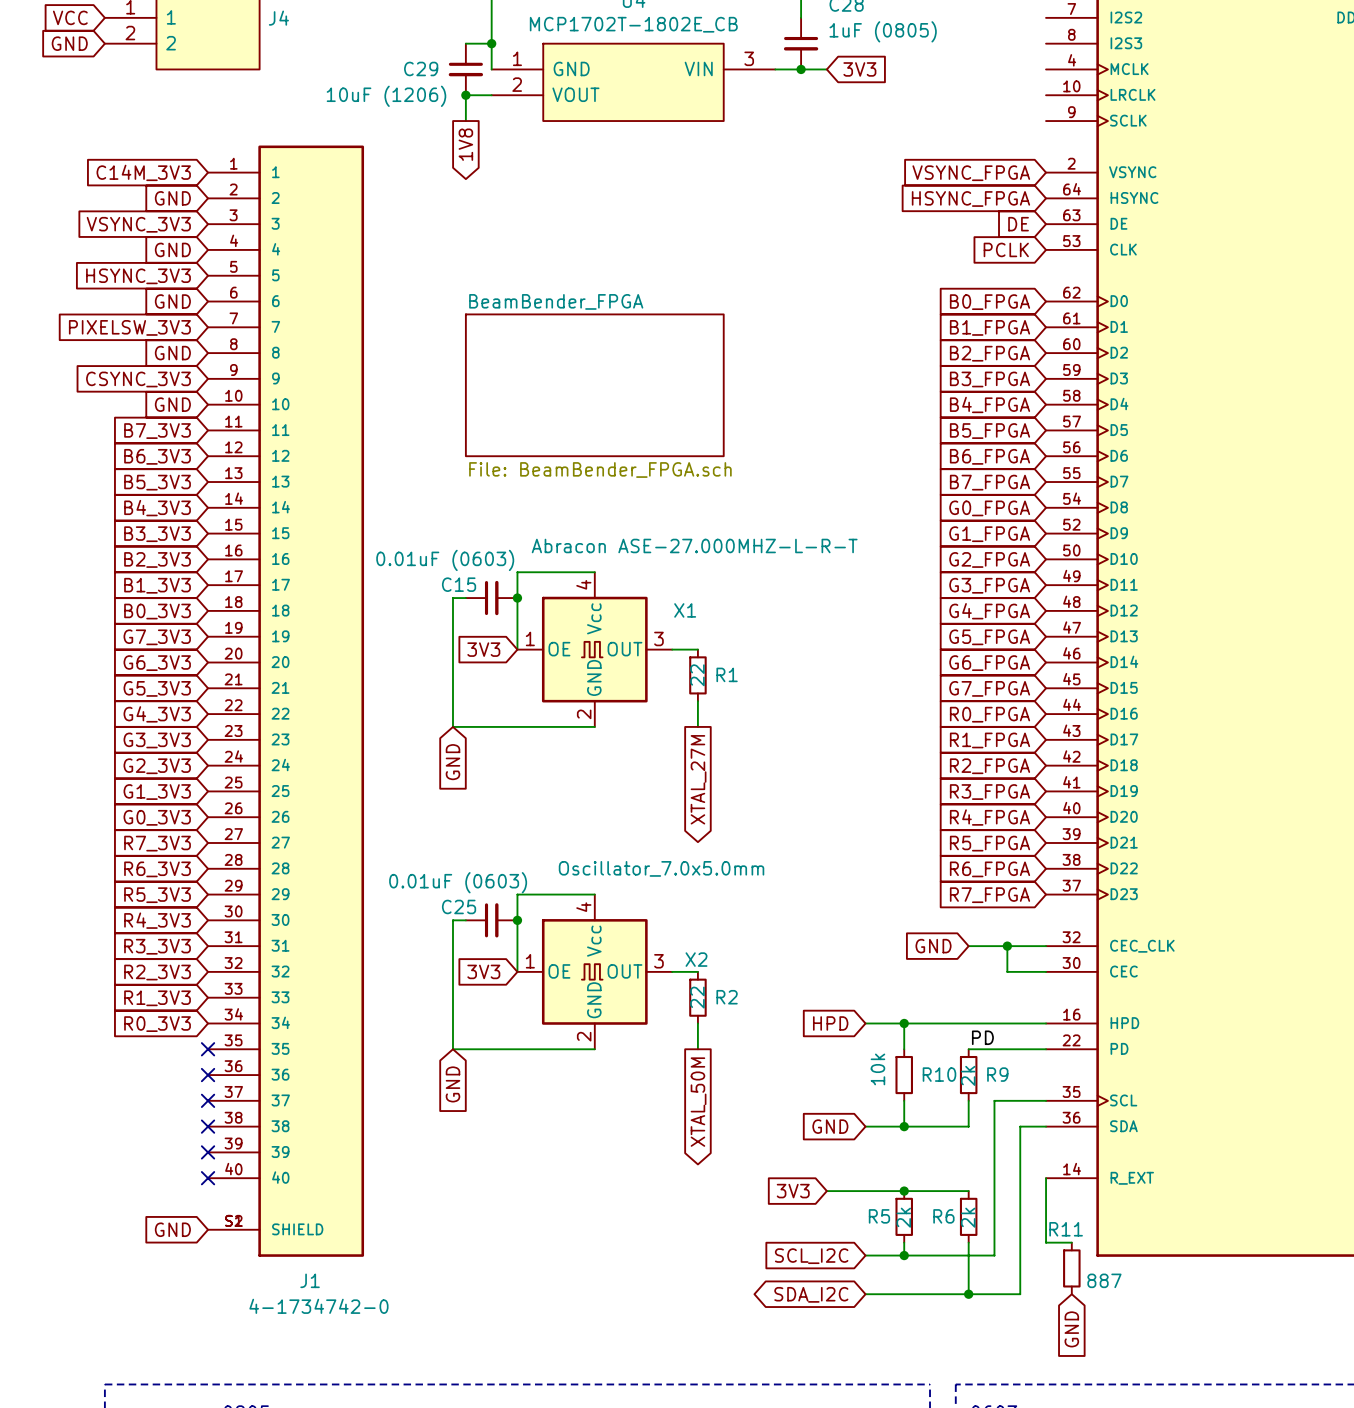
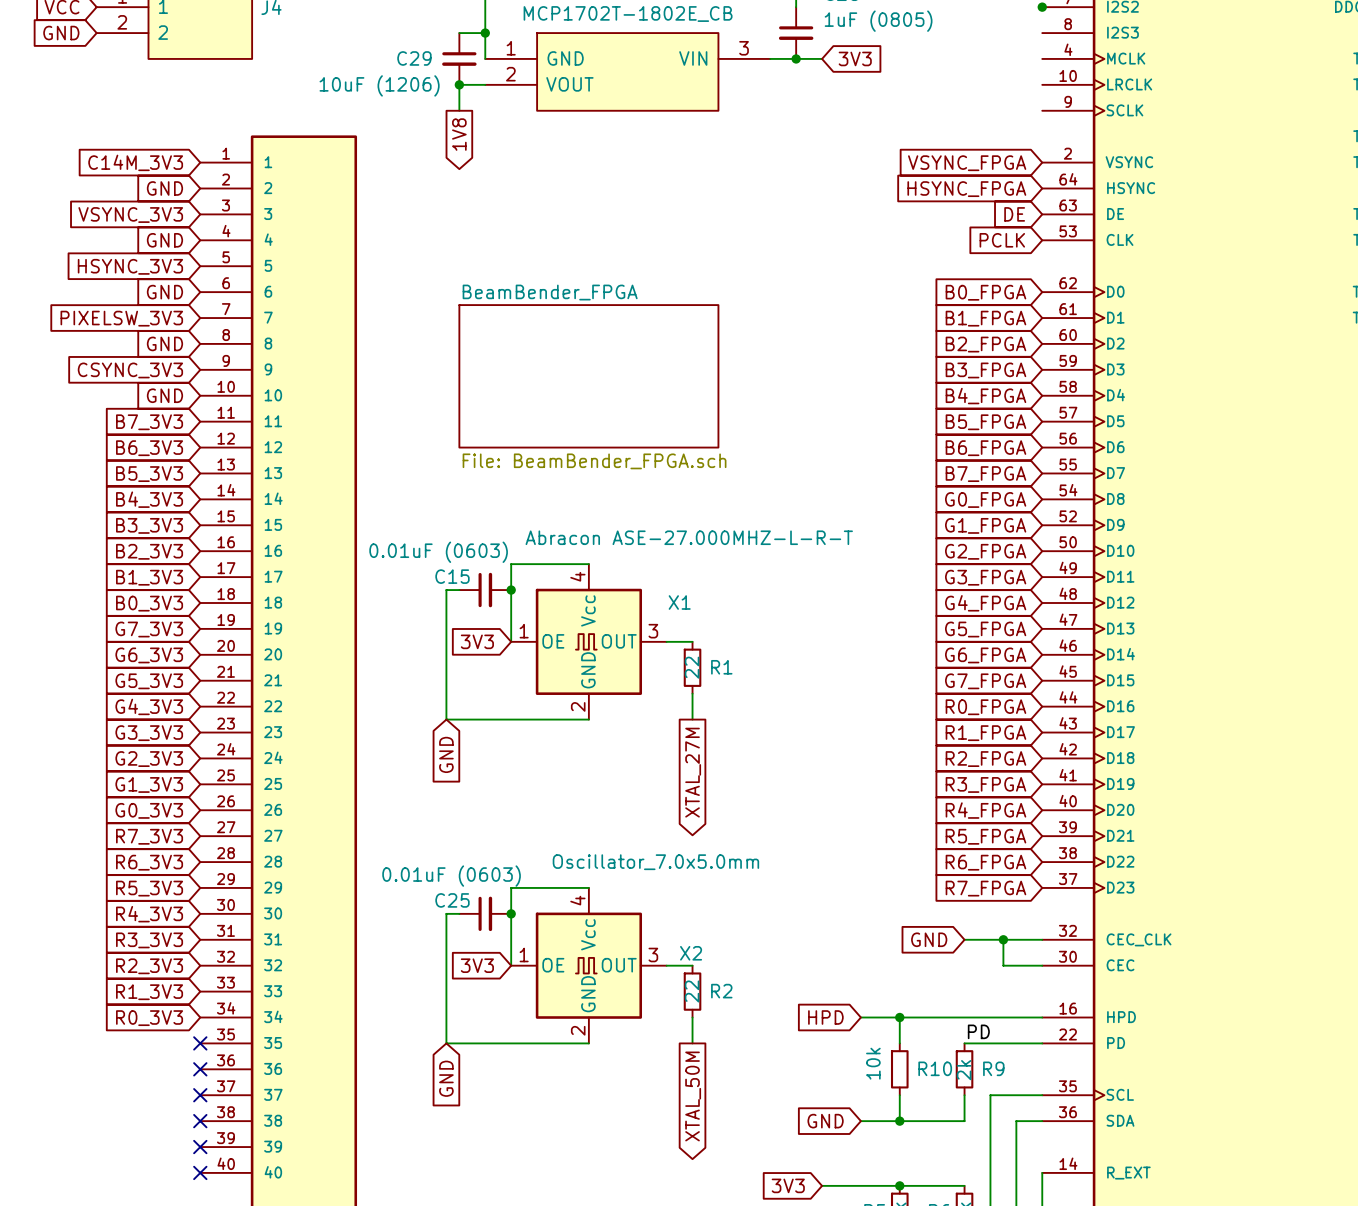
junction: none -> (1042, 7)

